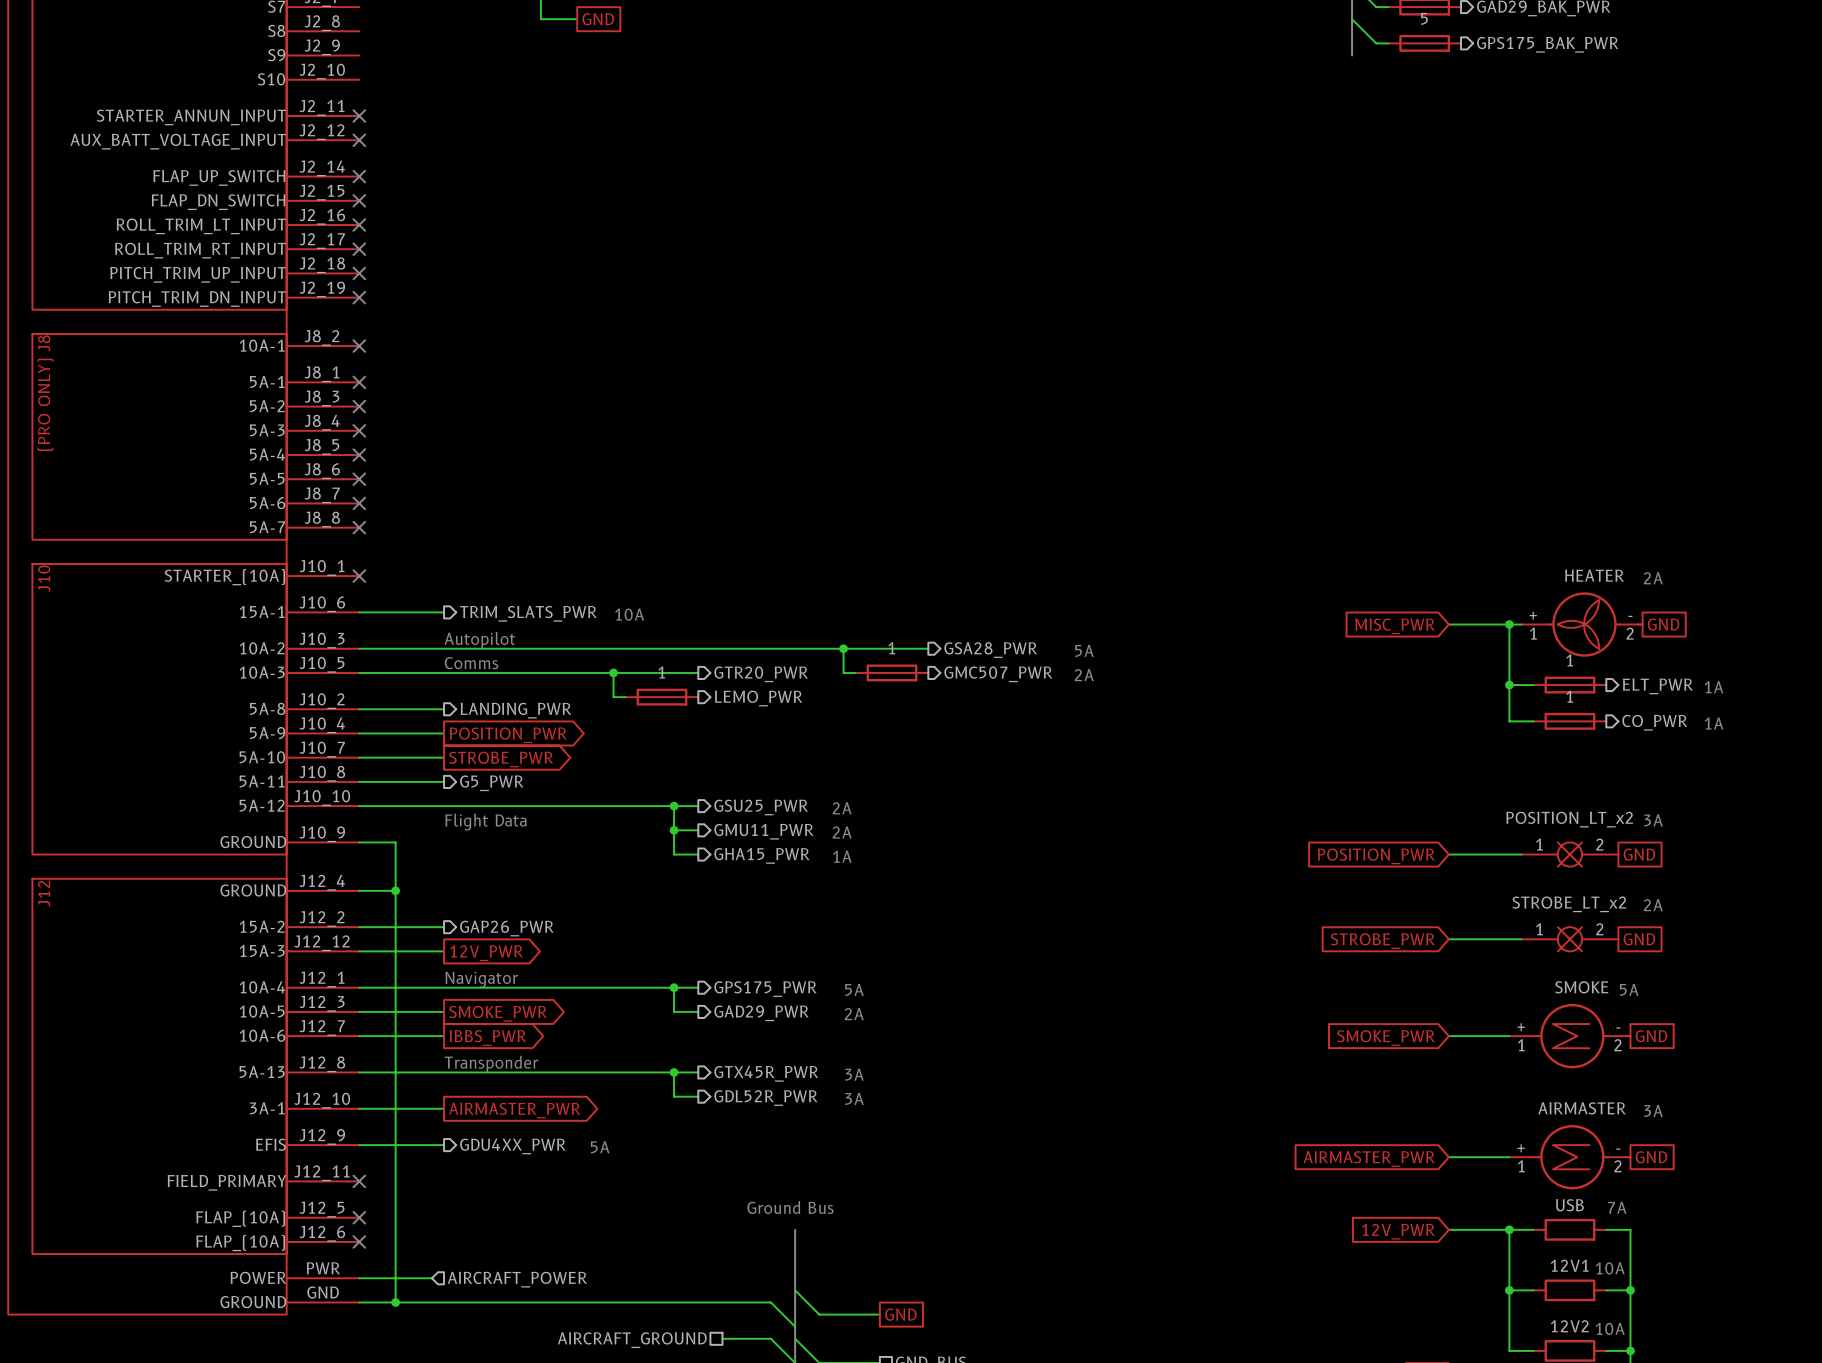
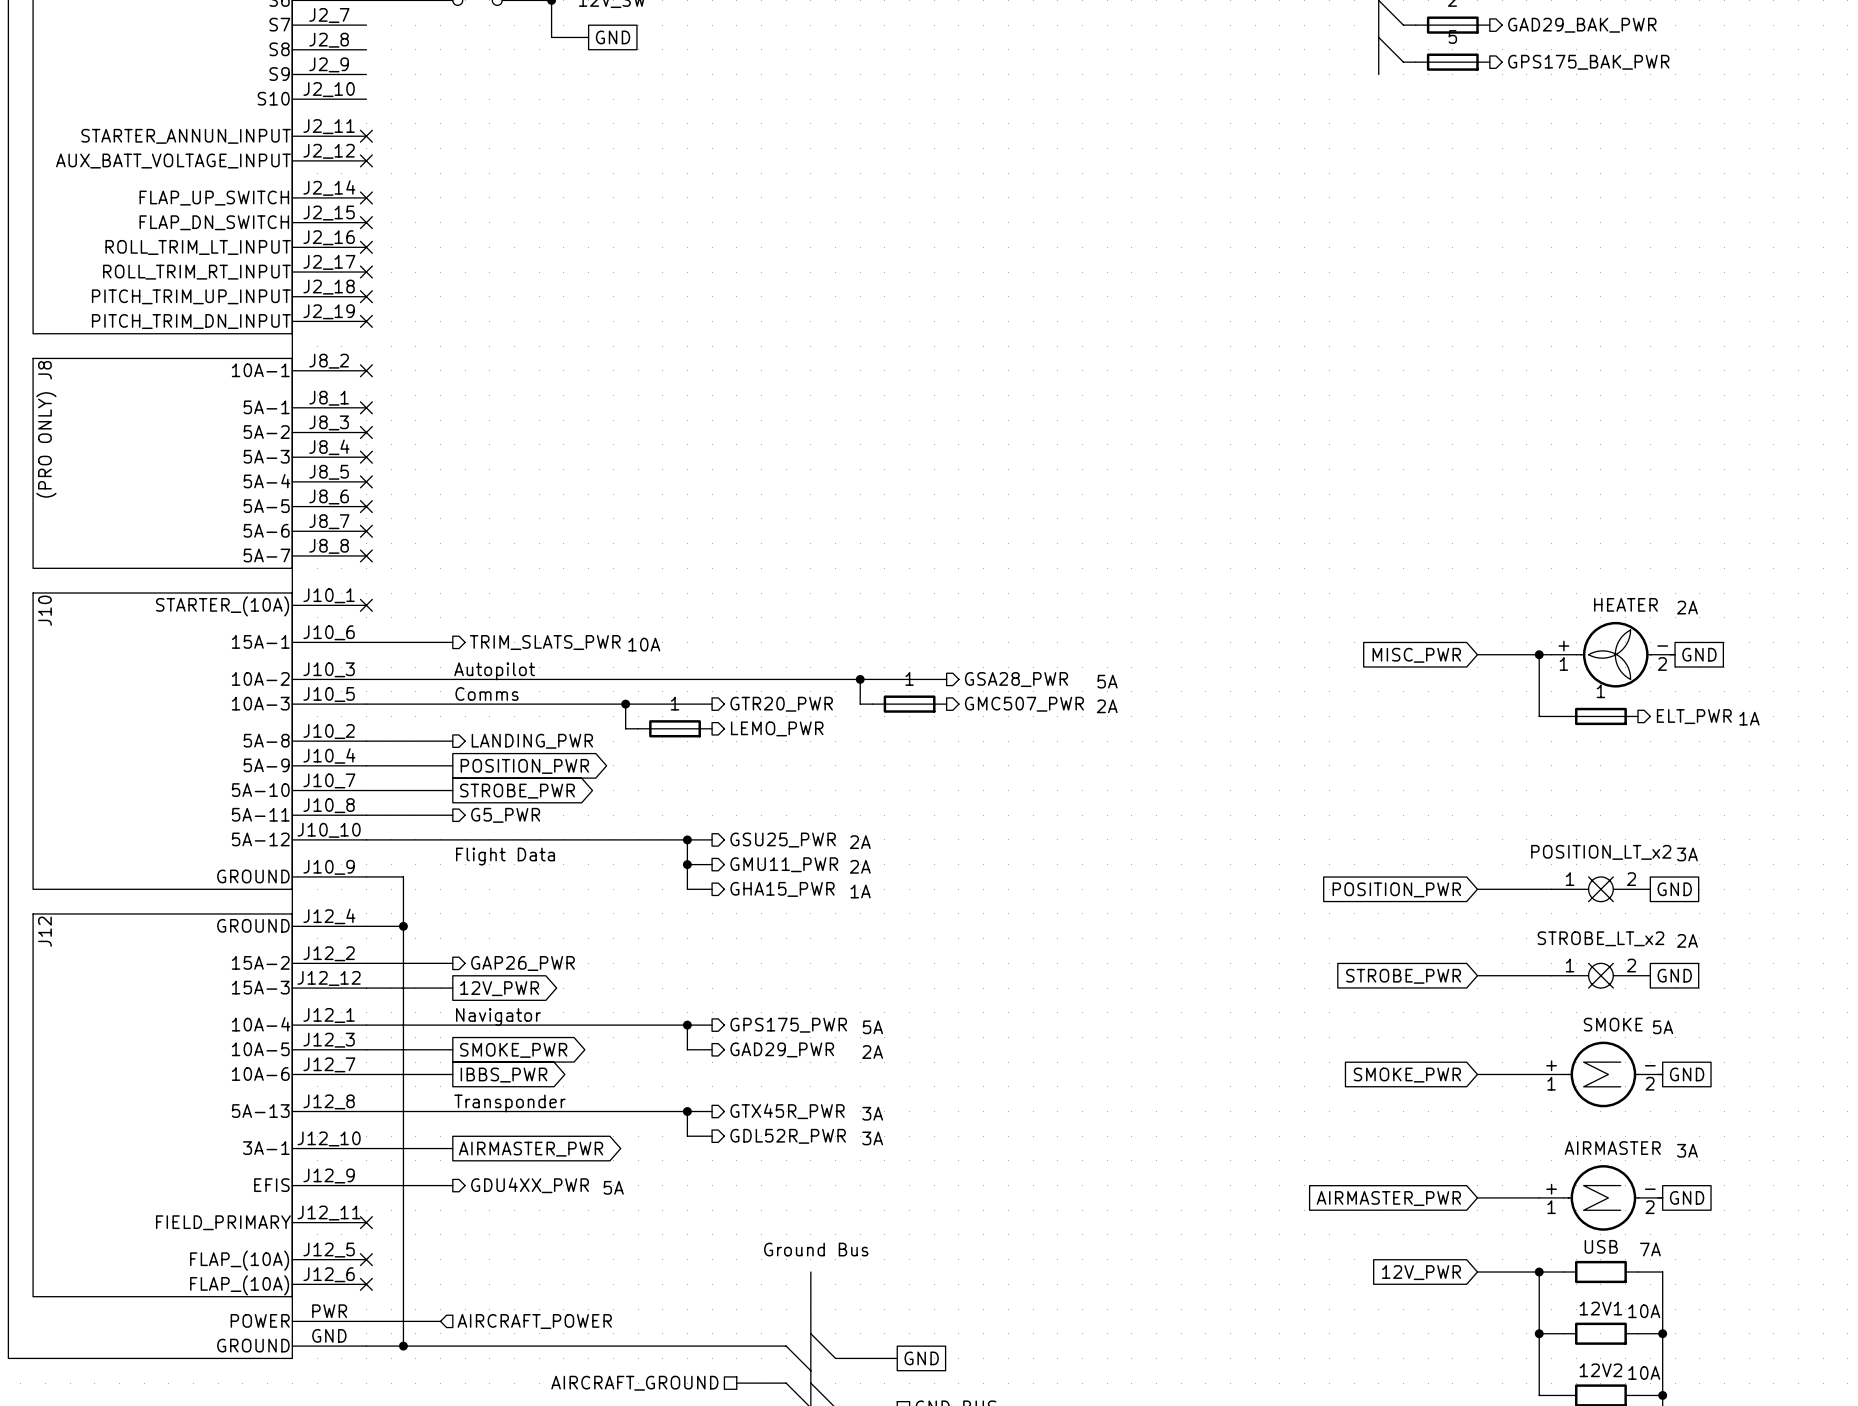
wire: (1509, 685) (1509, 721) (1533, 721) -> none
junction: (1509, 685) -> none
part: 1 (1569, 721) -> none
hierarchical label: CO_PWR (1654, 722) -> none
text: 1A (1714, 723) -> none

